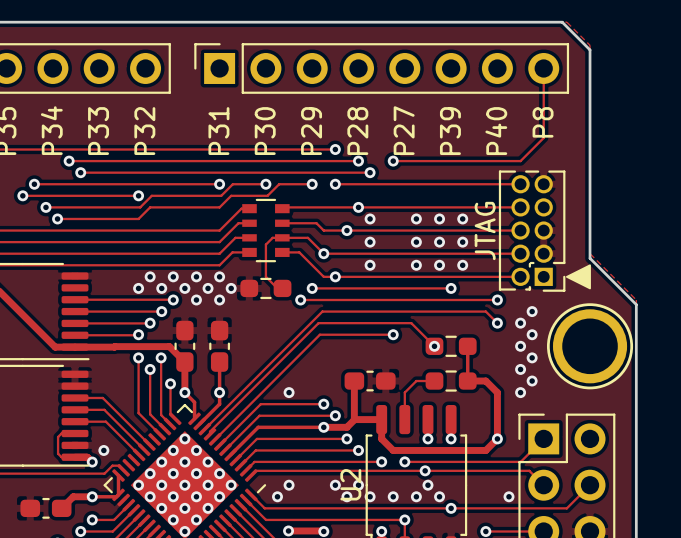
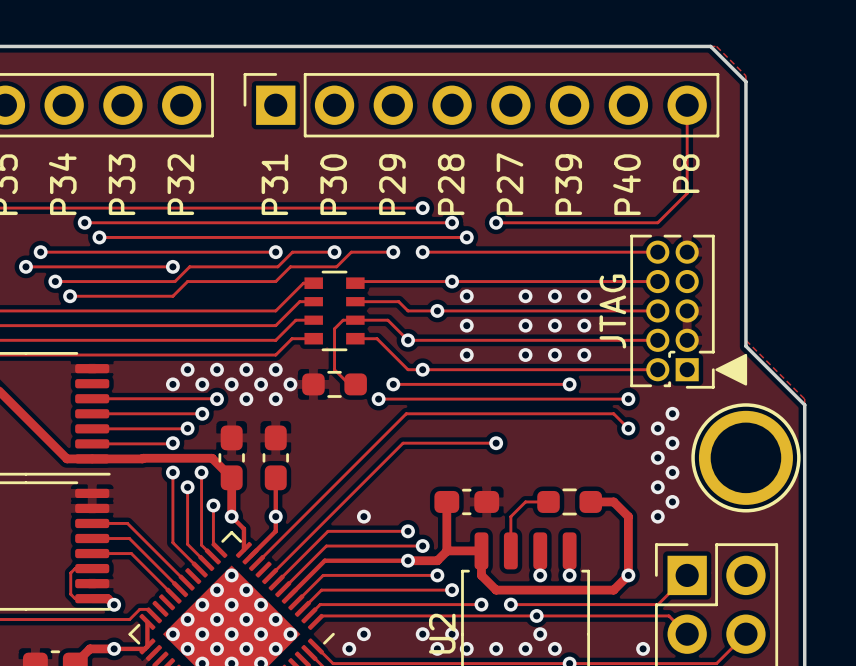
track: (434, 346) (411, 323) (318, 323) (210, 431) (210, 434) -> none
via: (434, 346) -> none
part: (451, 346) -> none
track: (467, 346) (467, 381) -> none
via: (103, 450) -> none

